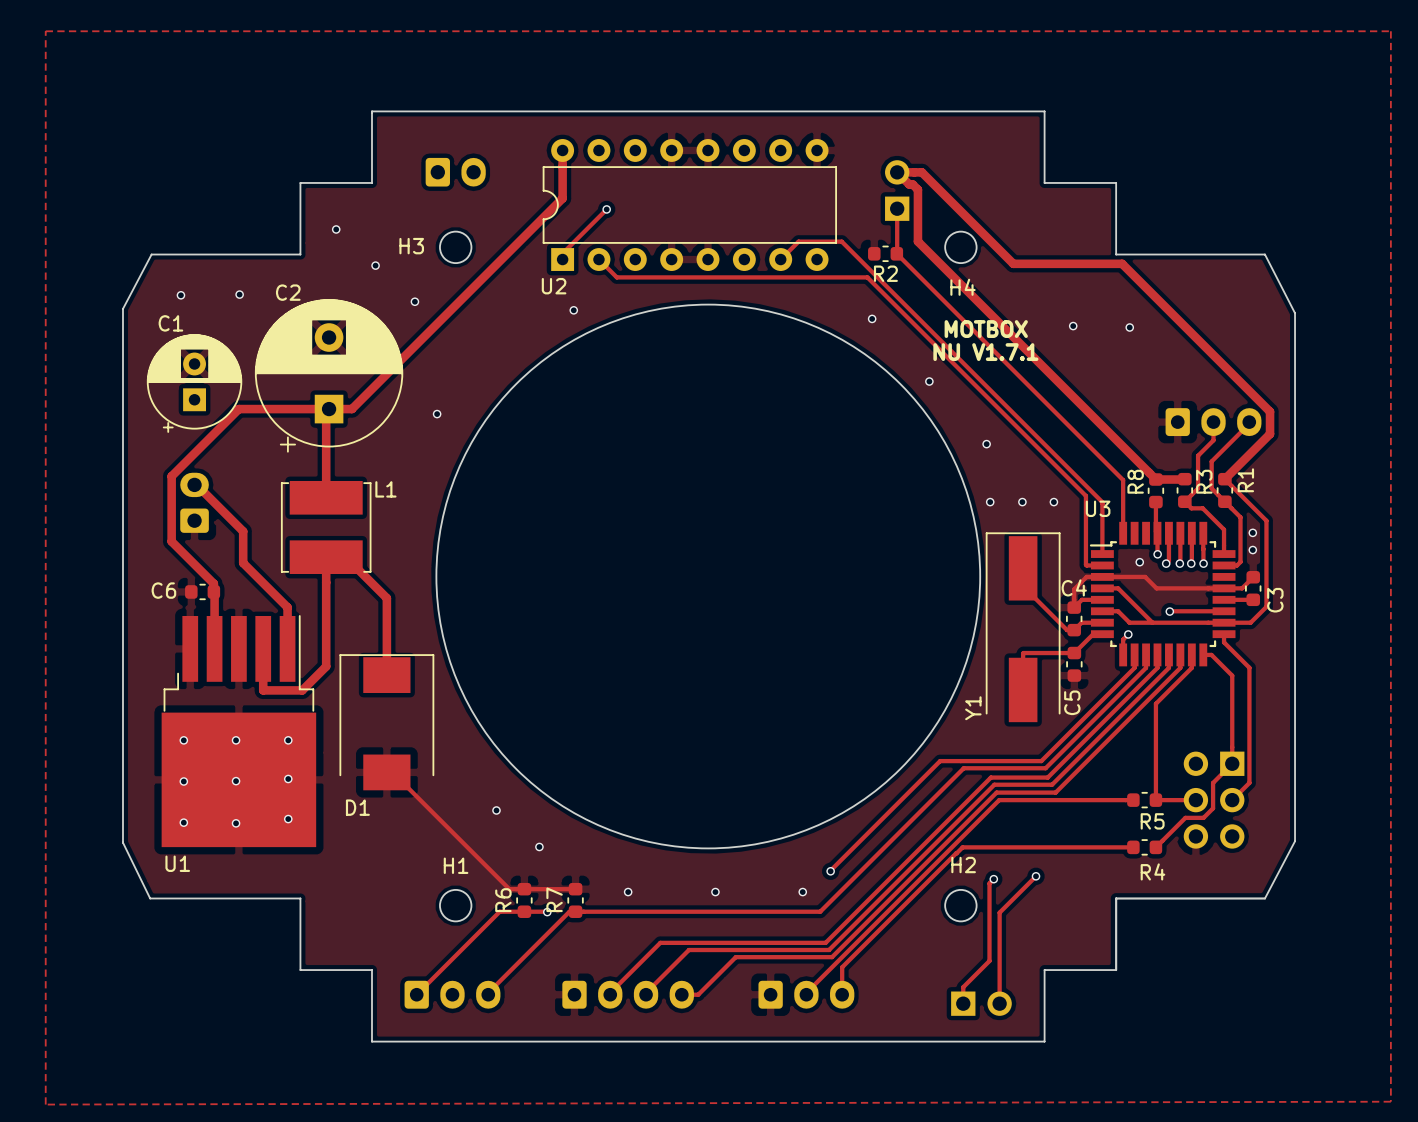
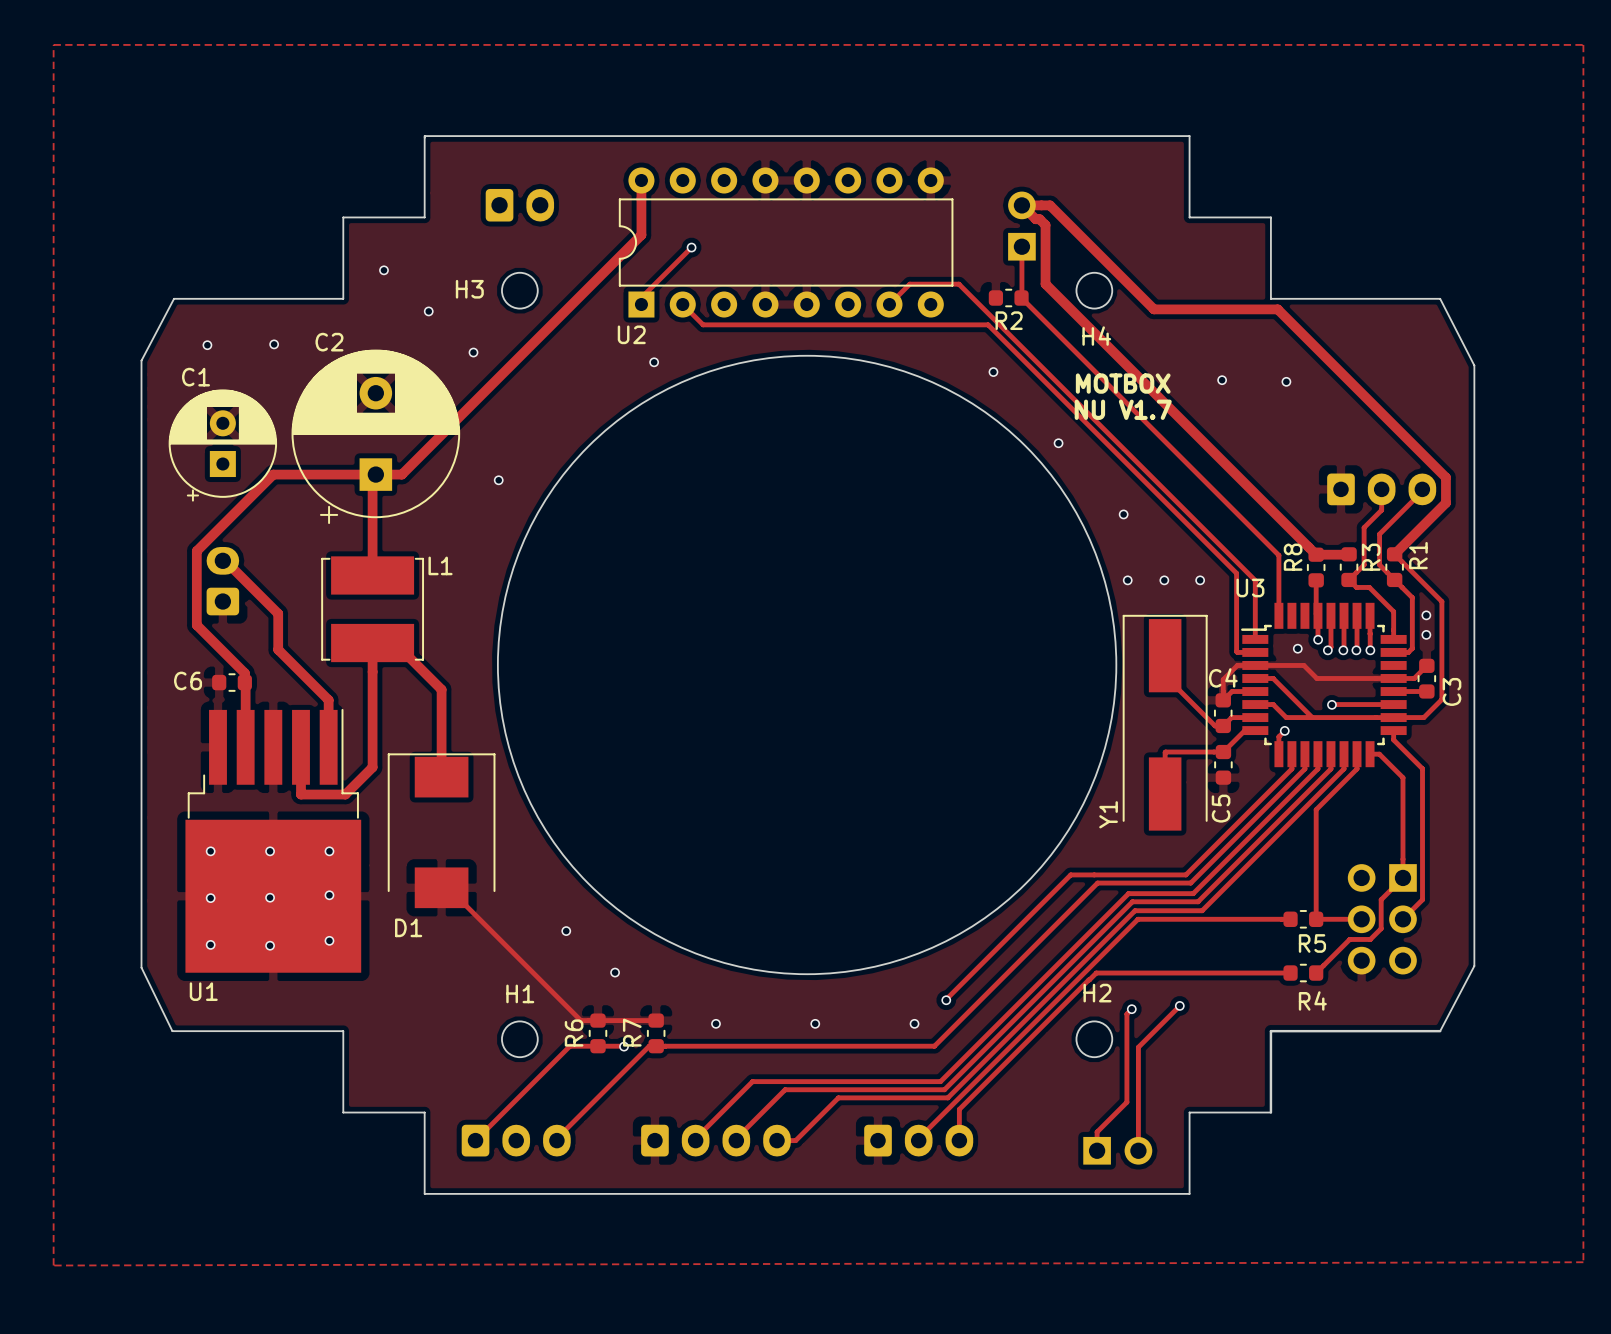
text: NU V1.7.1 (985, 352) -> NU V1.7 (1123, 409)

